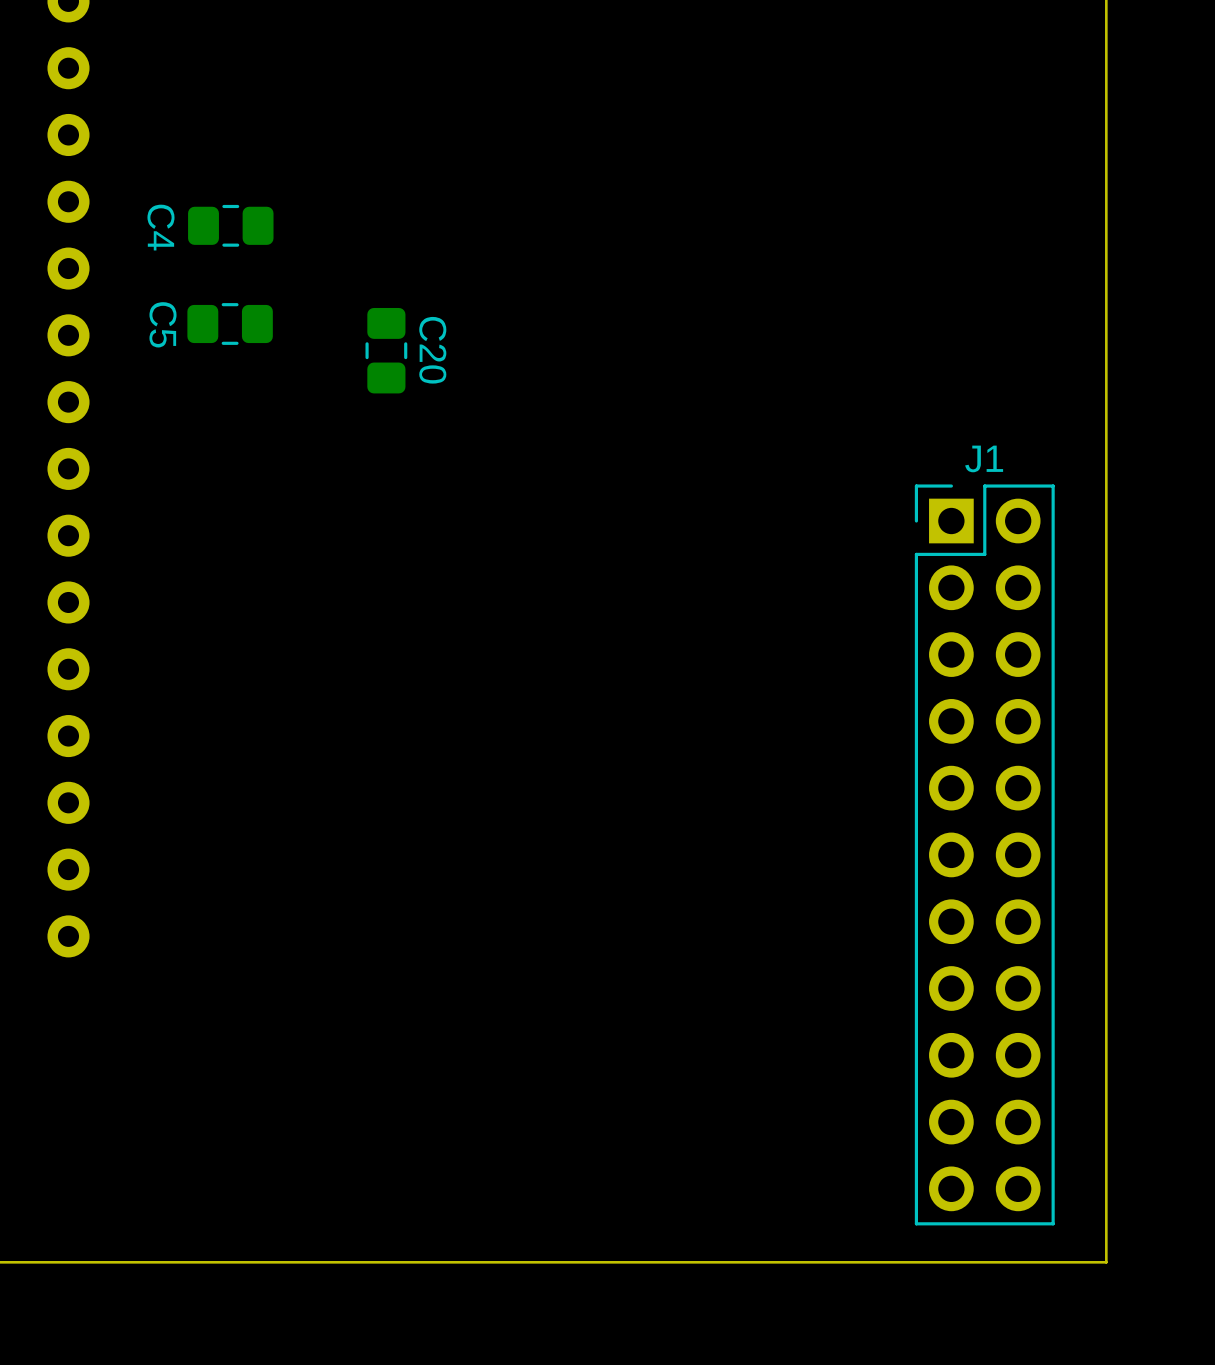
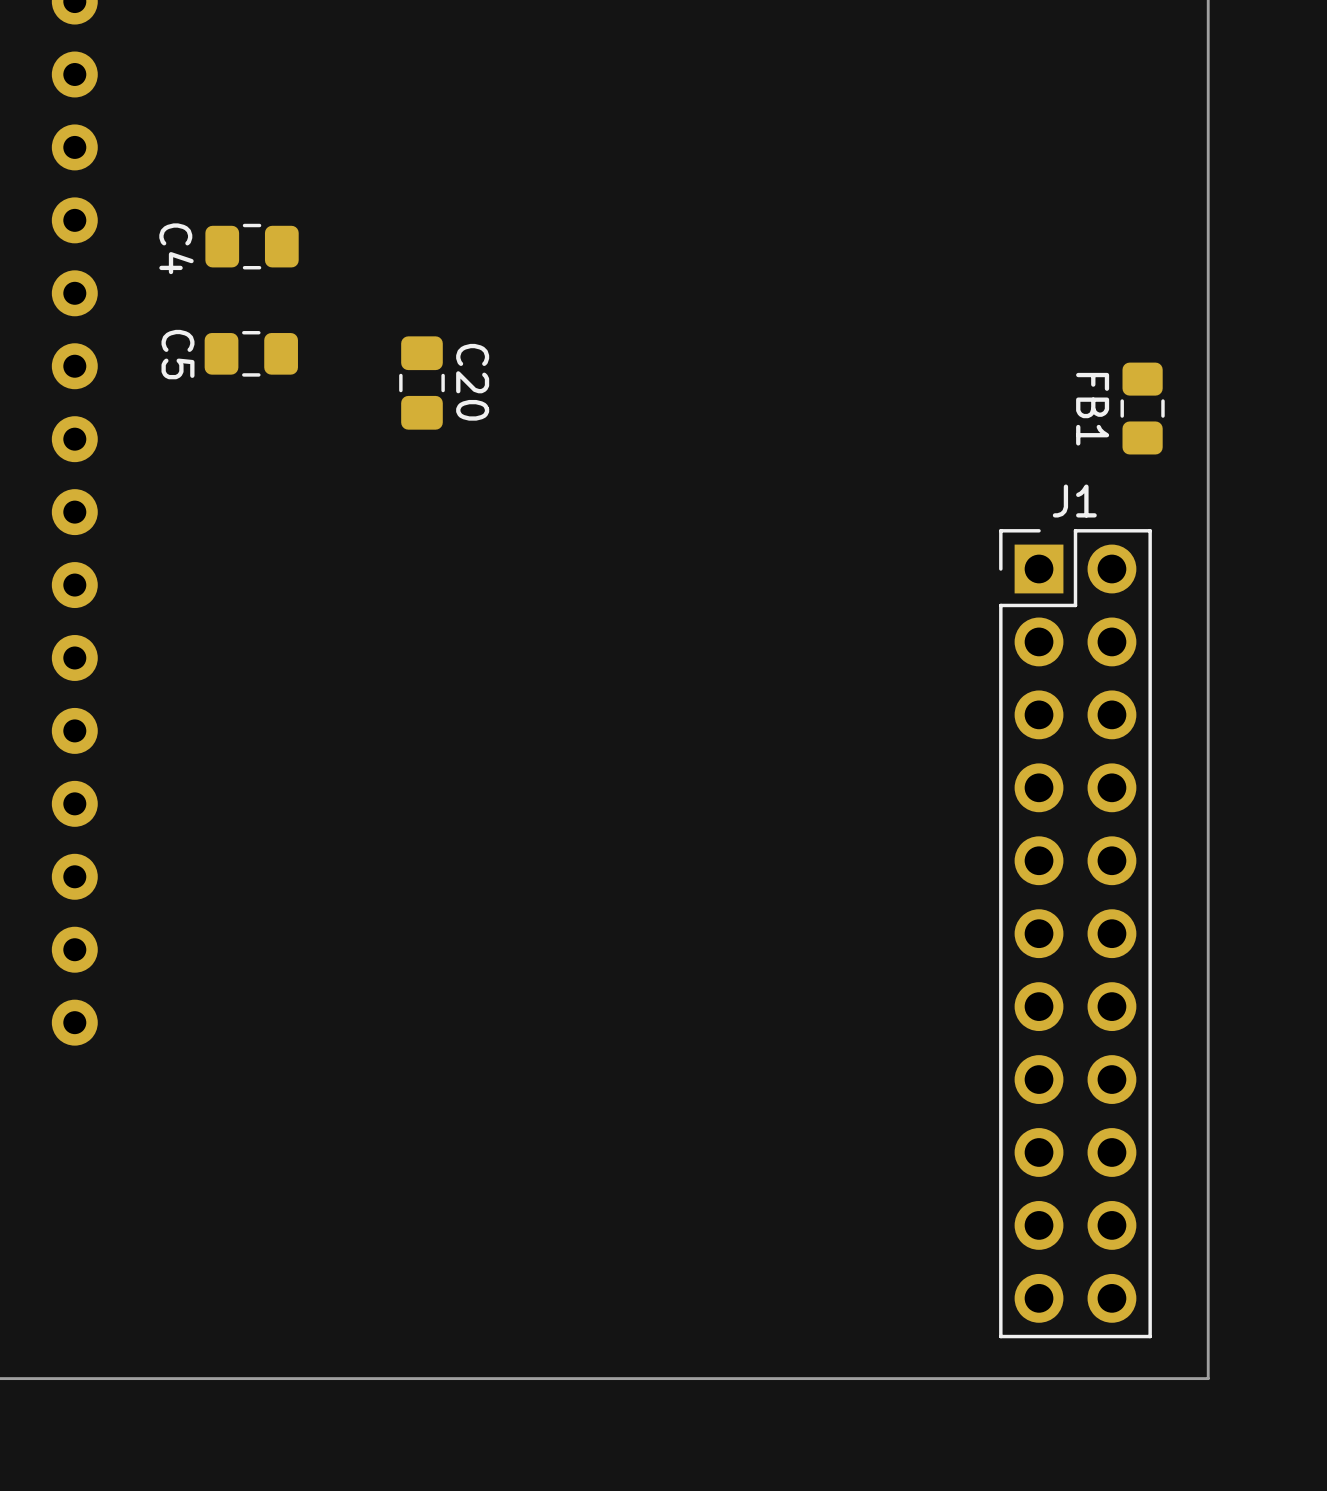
FB1: none -> (1142, 408)

